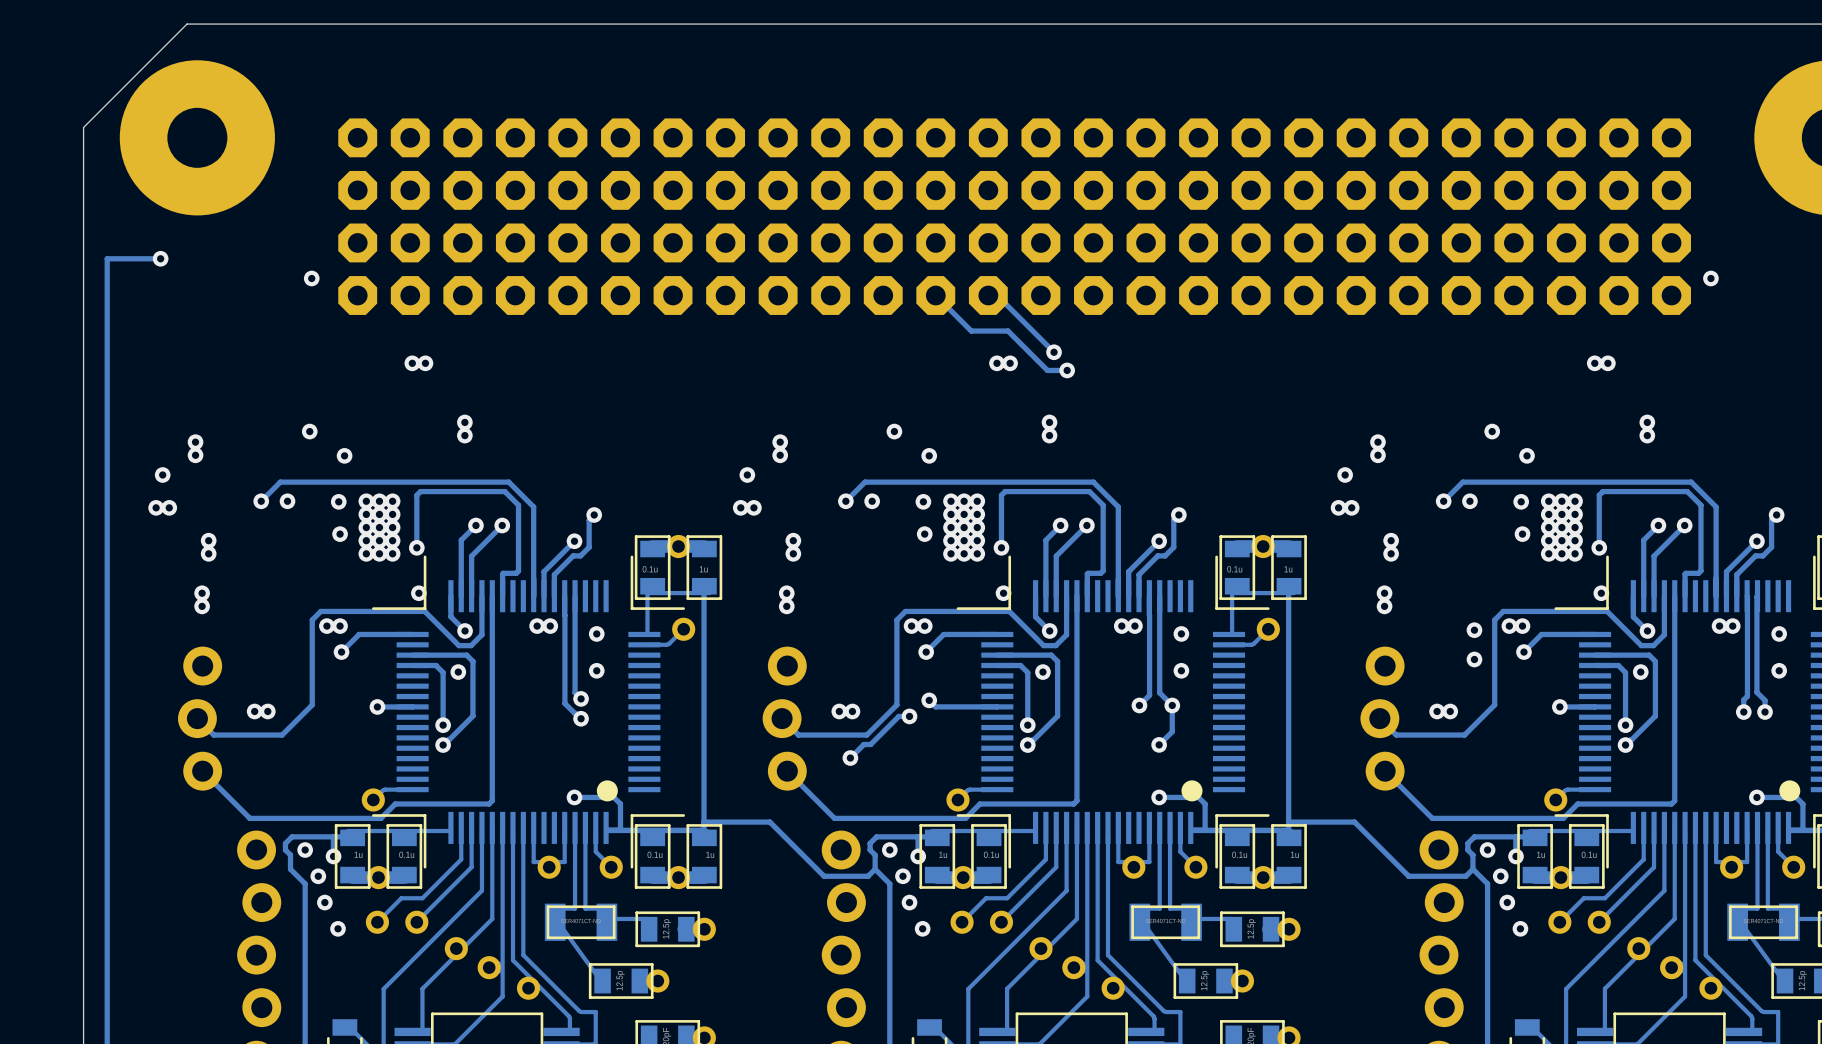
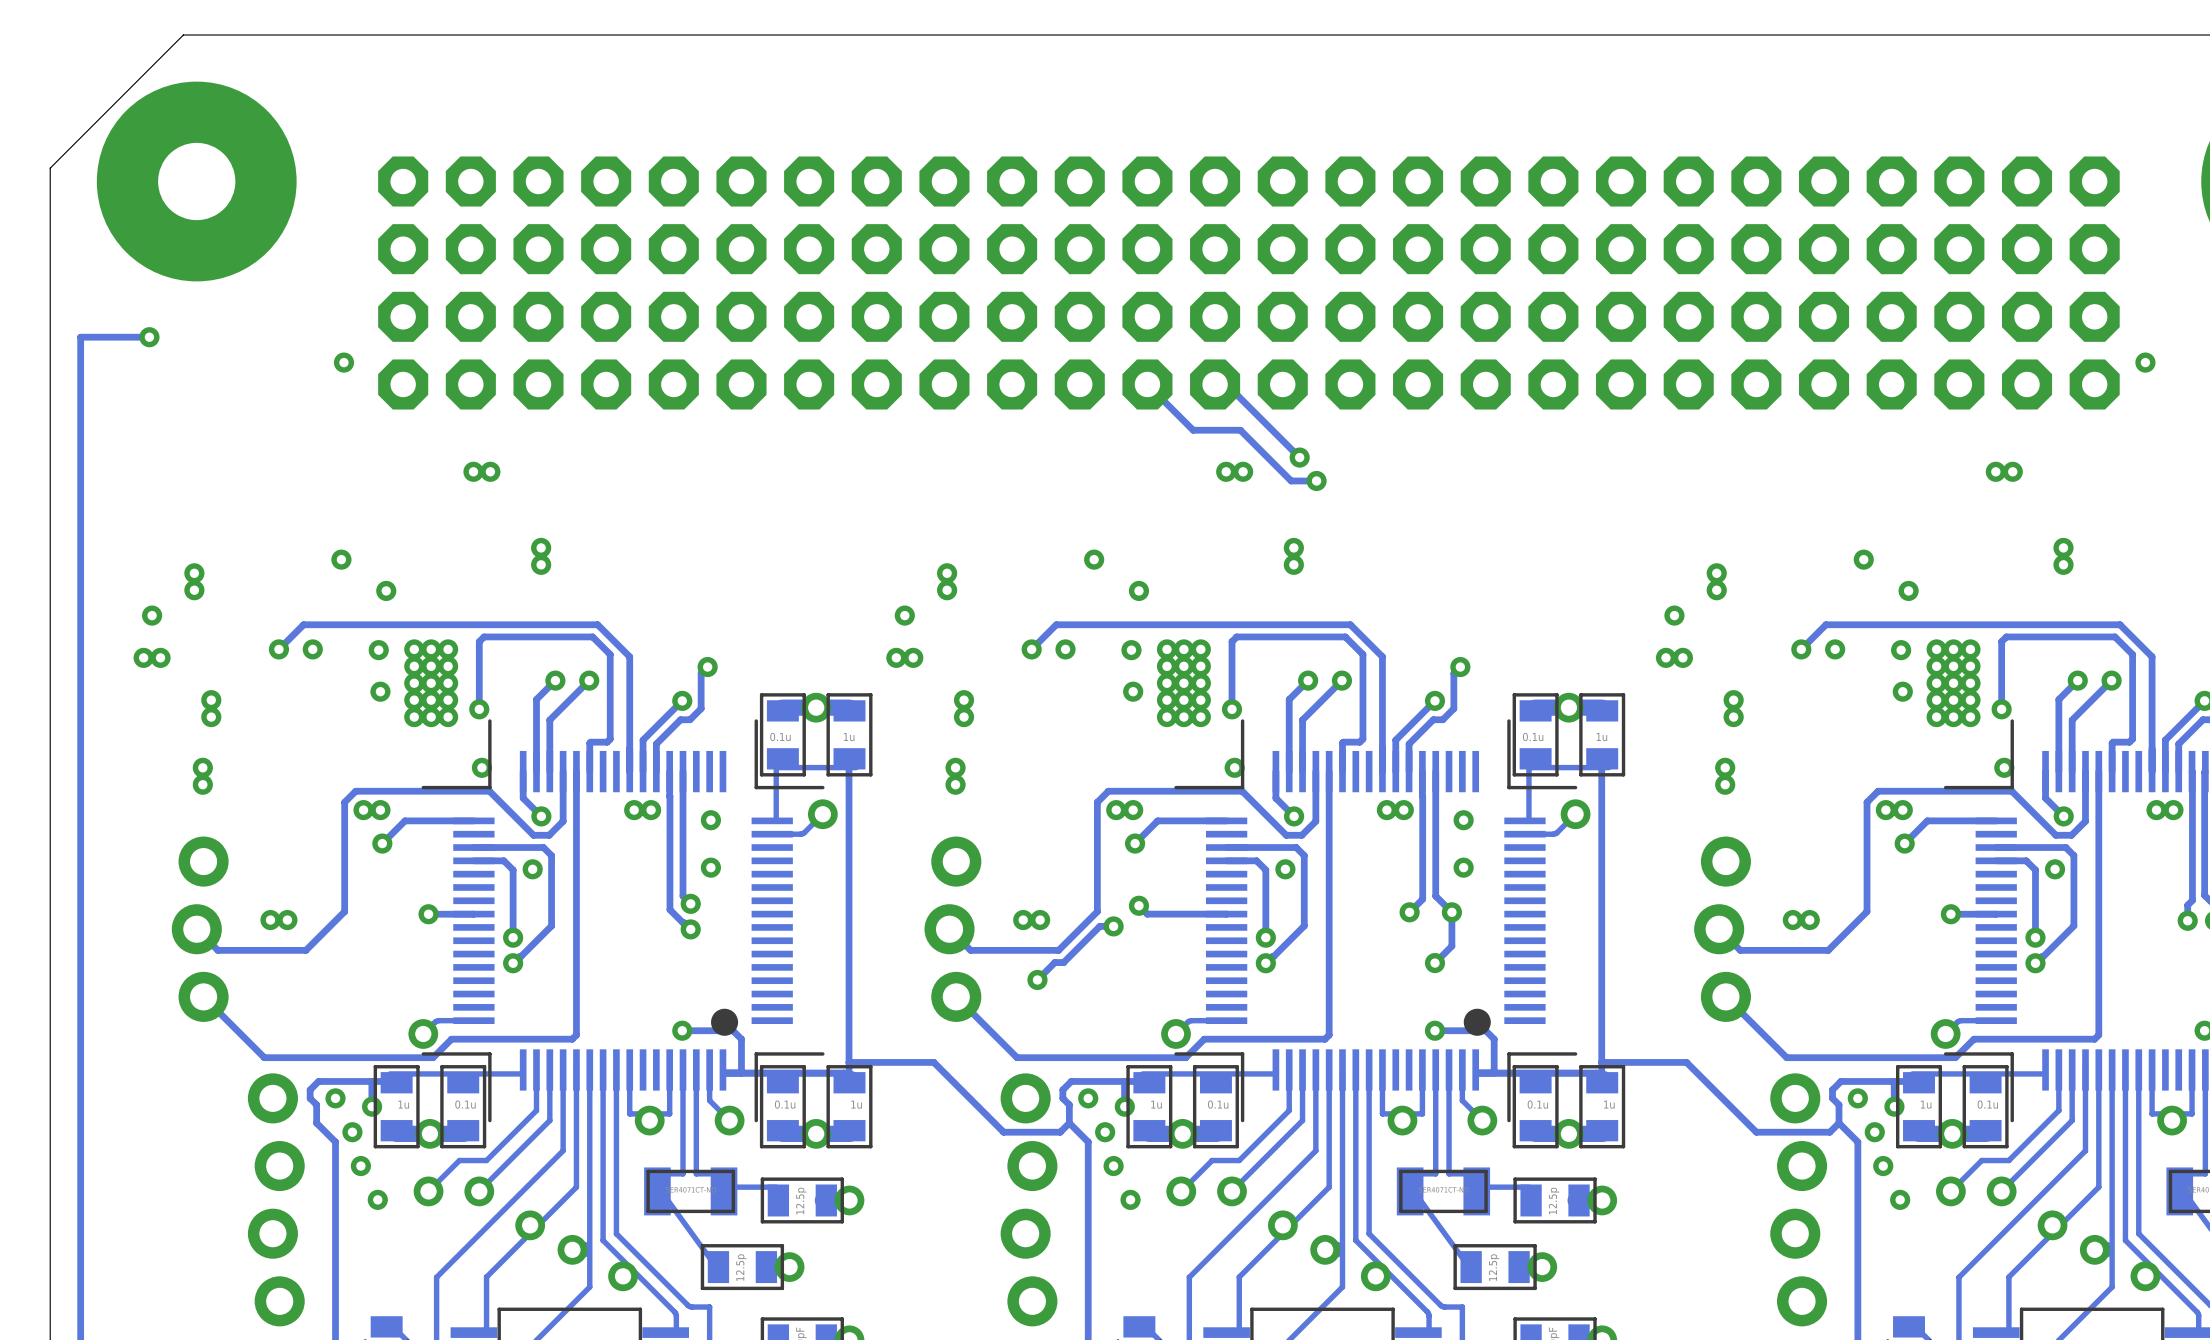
via: (1474, 630) -> none
via: (1474, 659) -> none

